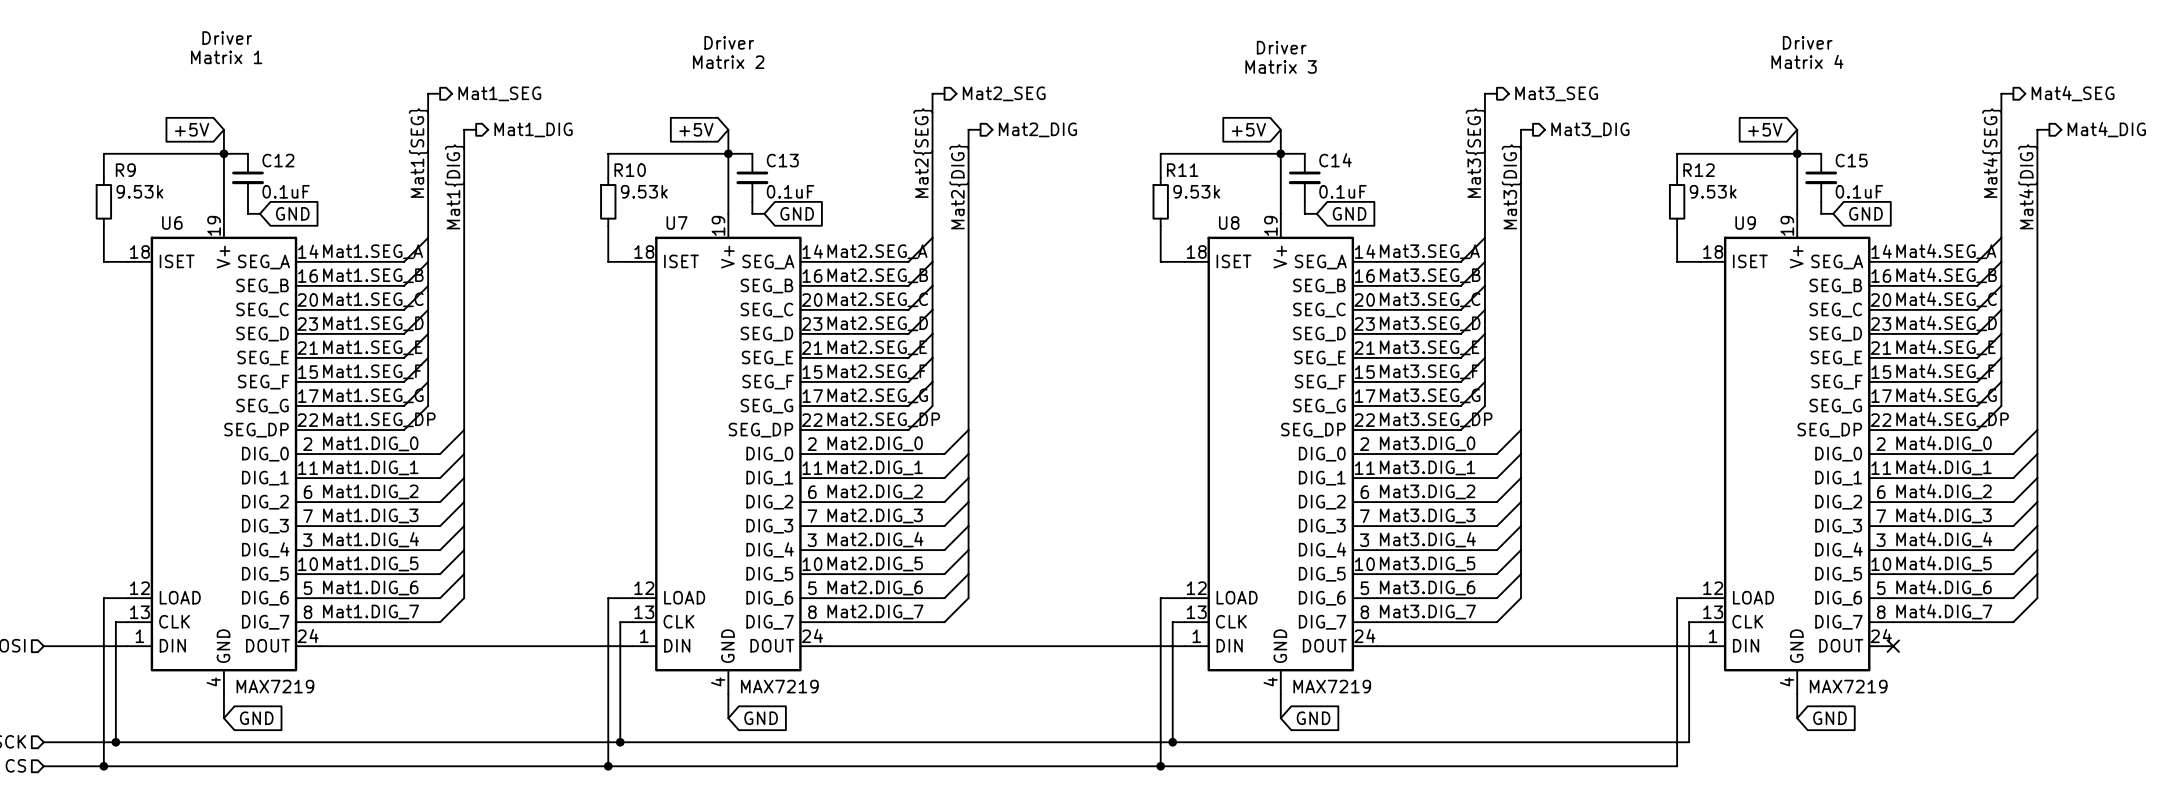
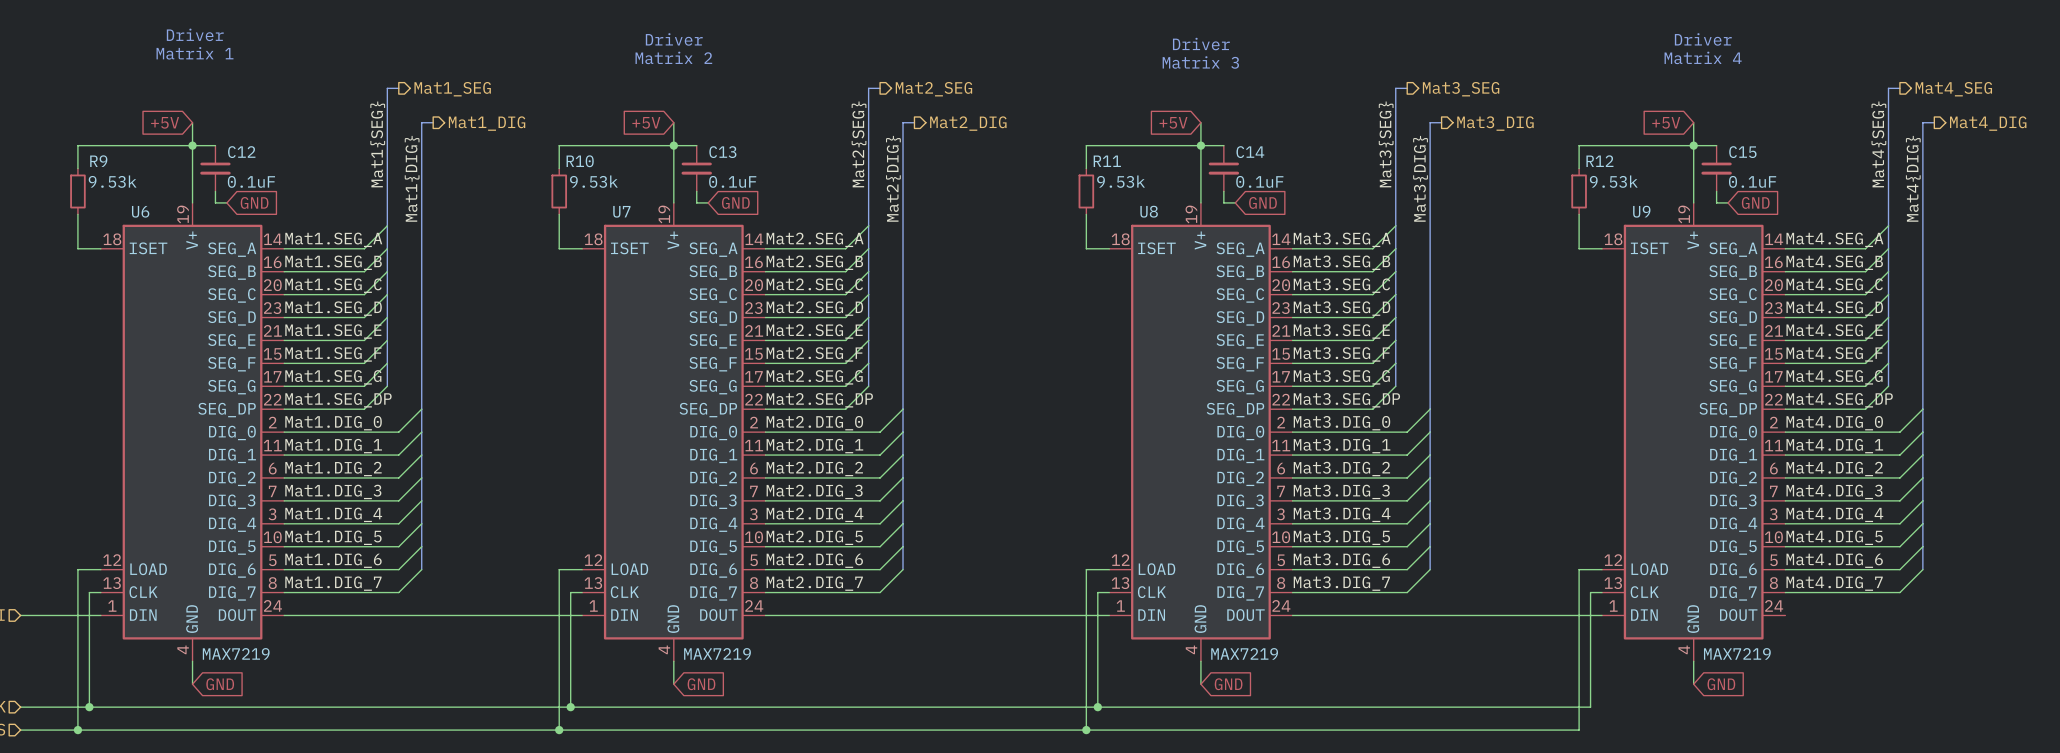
no-connect mark: (1893, 646) -> none

